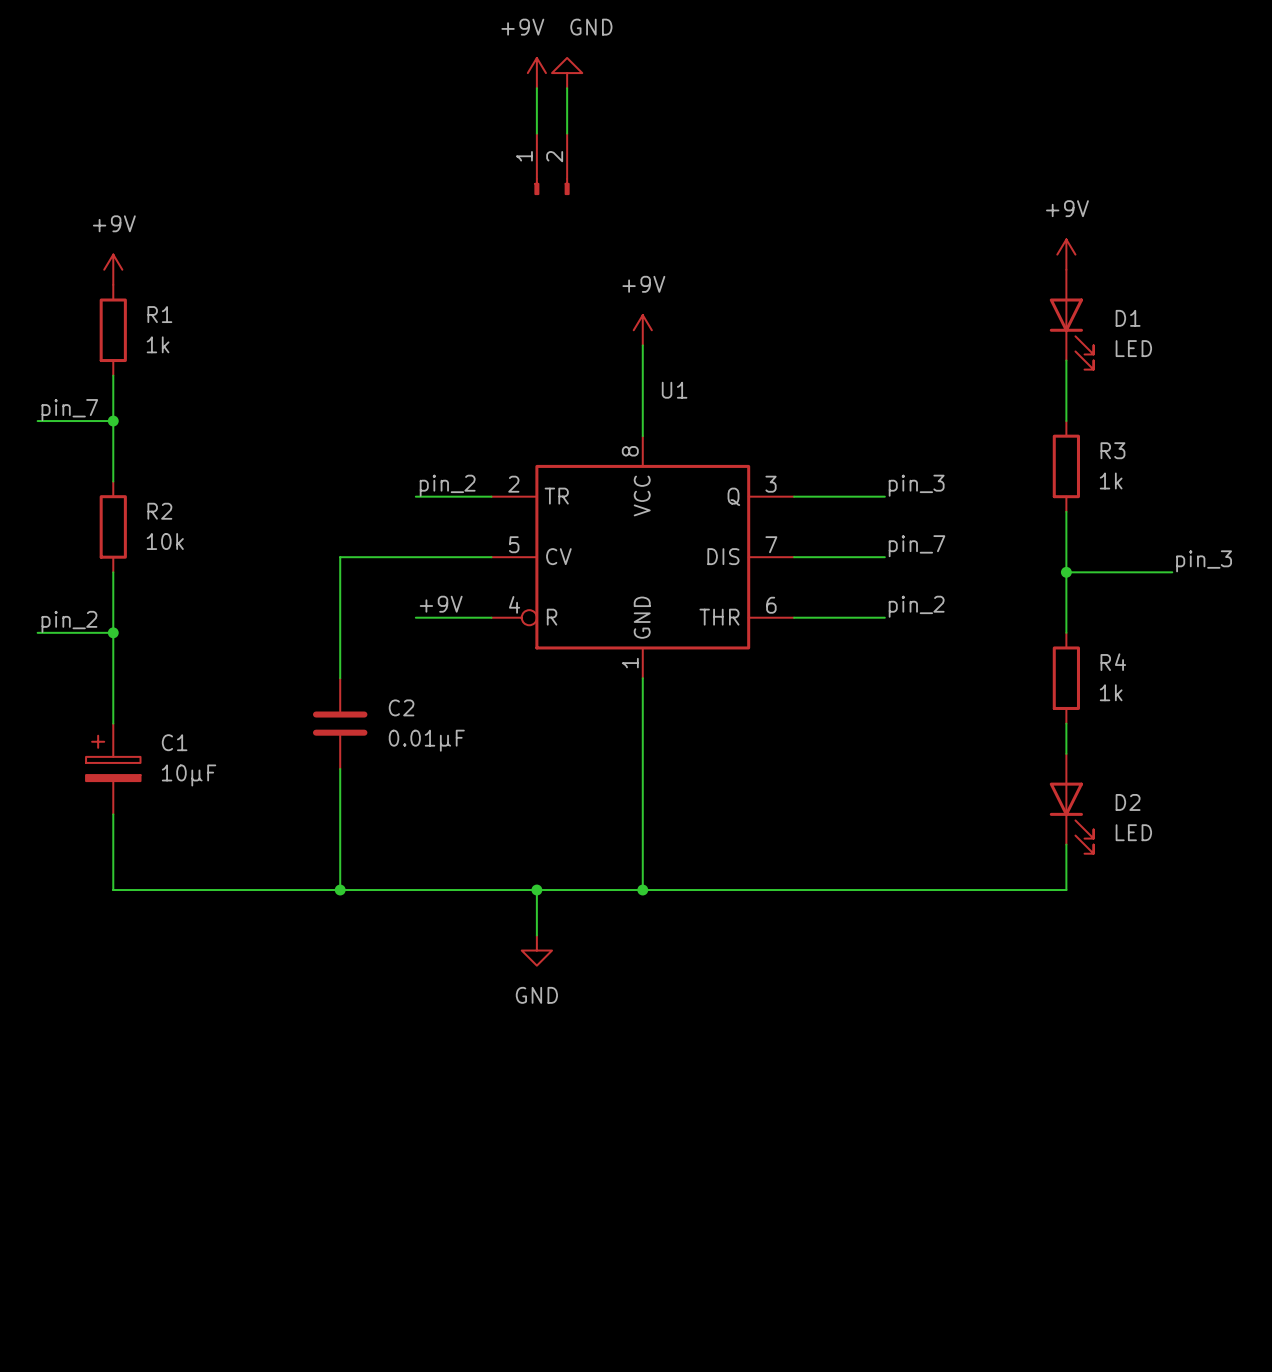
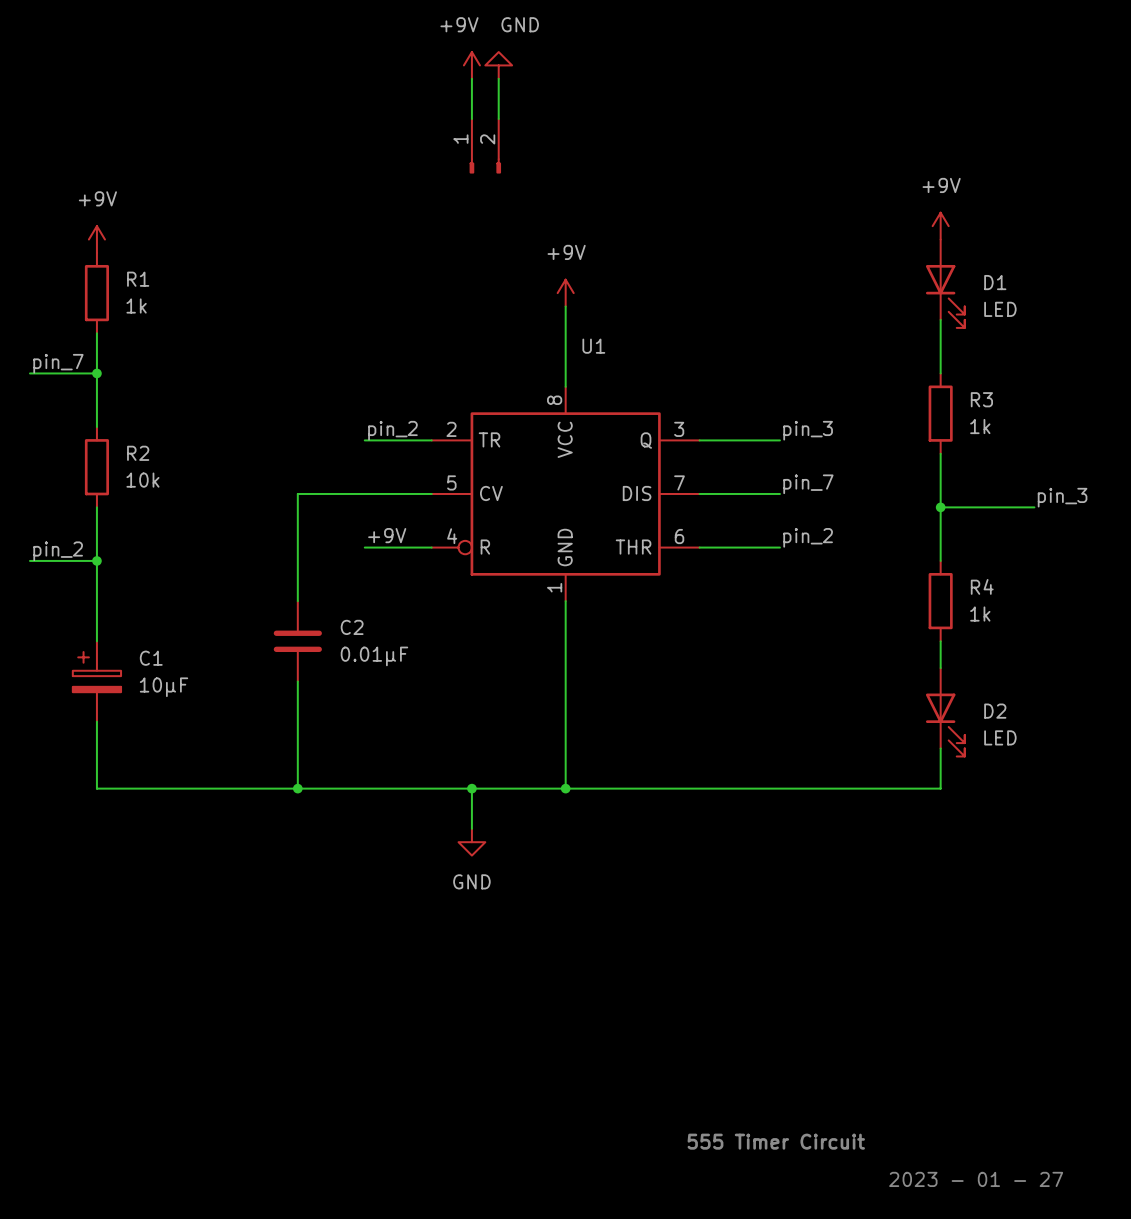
text: none -> 555 Timer Circuit (776, 1141)
text: none -> 2023 - 01 - 27 (976, 1179)

